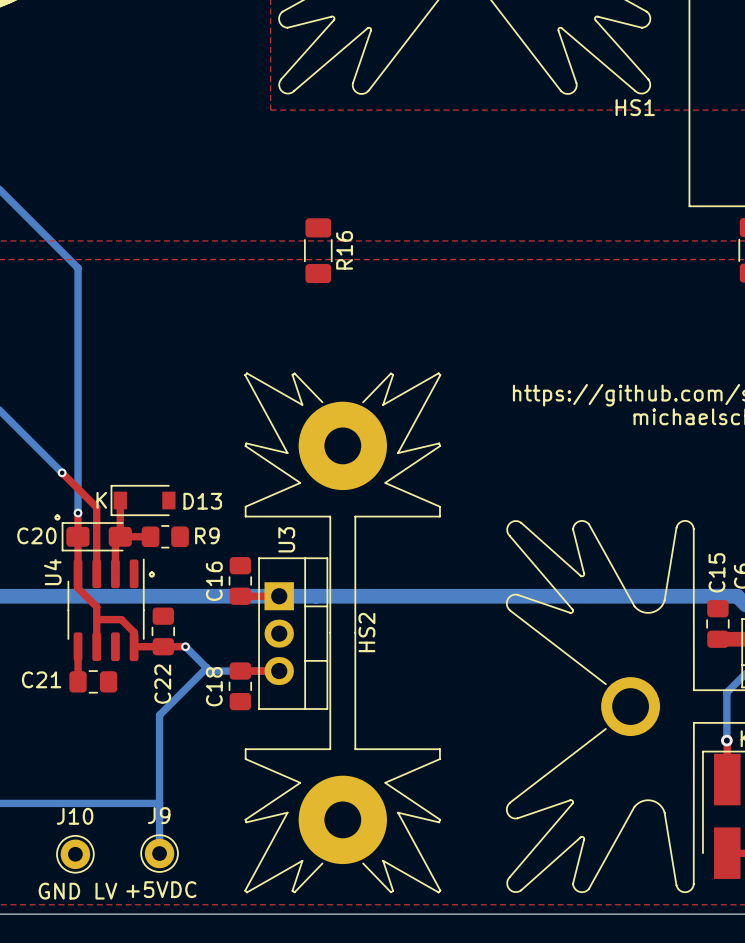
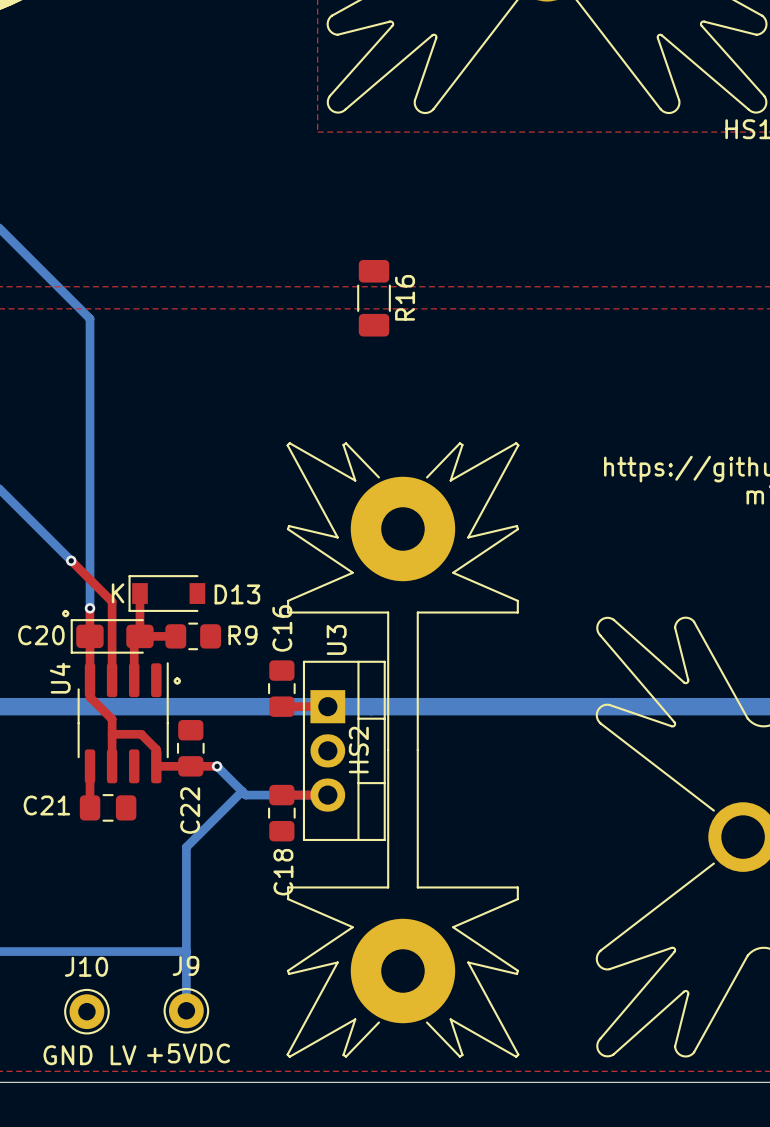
C16 name position: C16 (214, 581) -> C16 (282, 628)
HS2 name position: HS2 (366, 632) -> HS2 (358, 750)
C18 name position: C18 (214, 686) -> C18 (283, 872)

